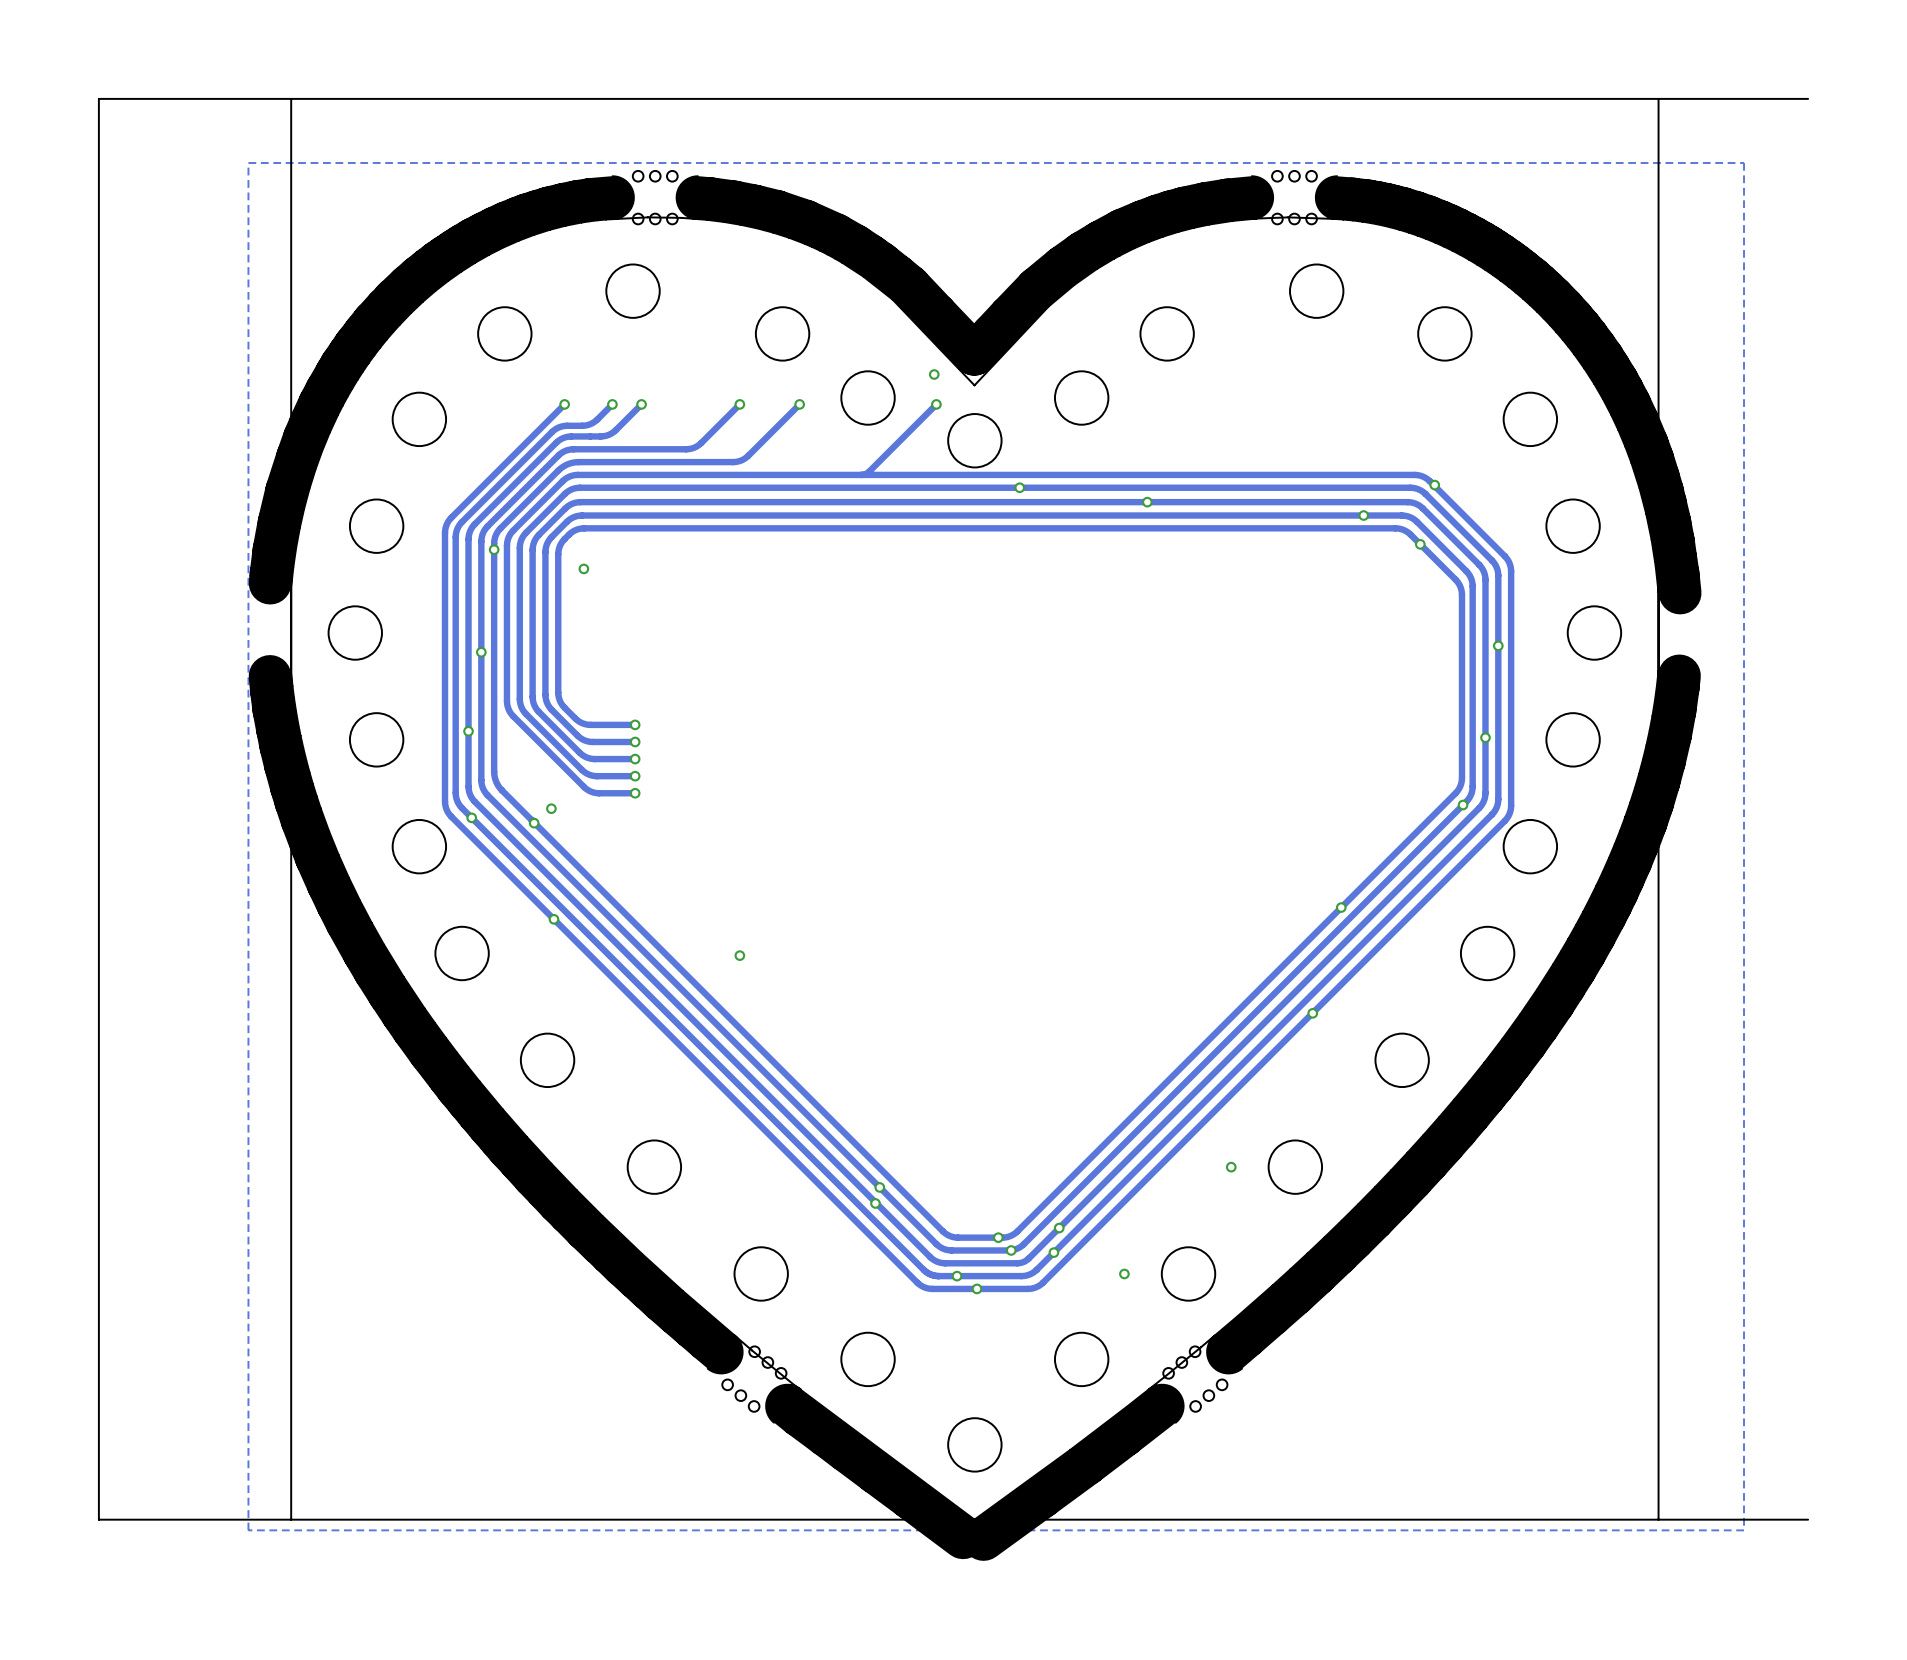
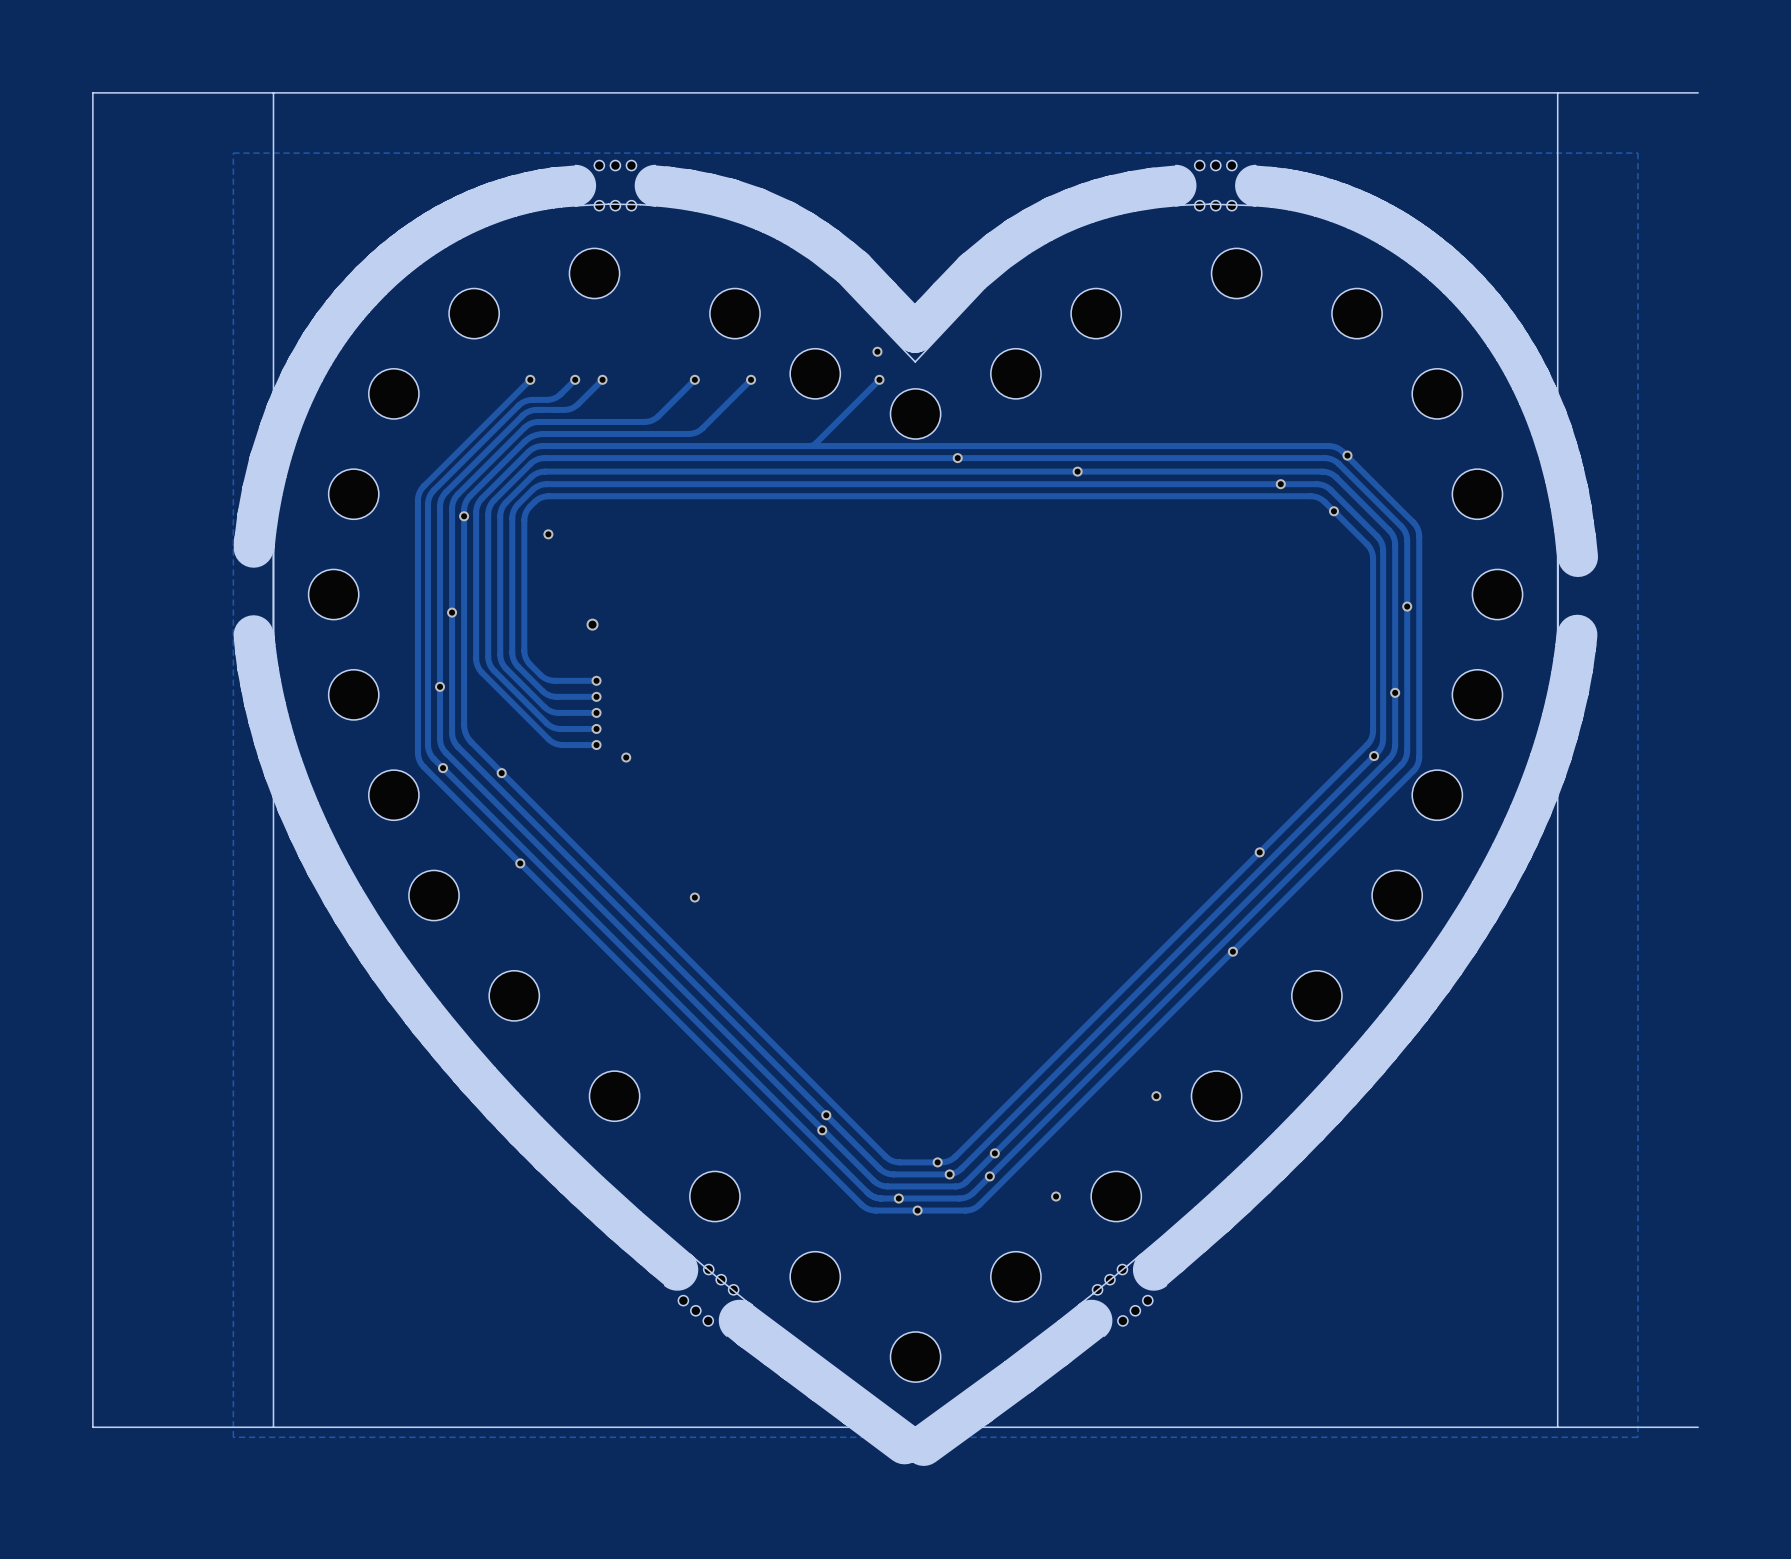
via: none -> (592, 624)
via position: (551, 808) -> (626, 757)

